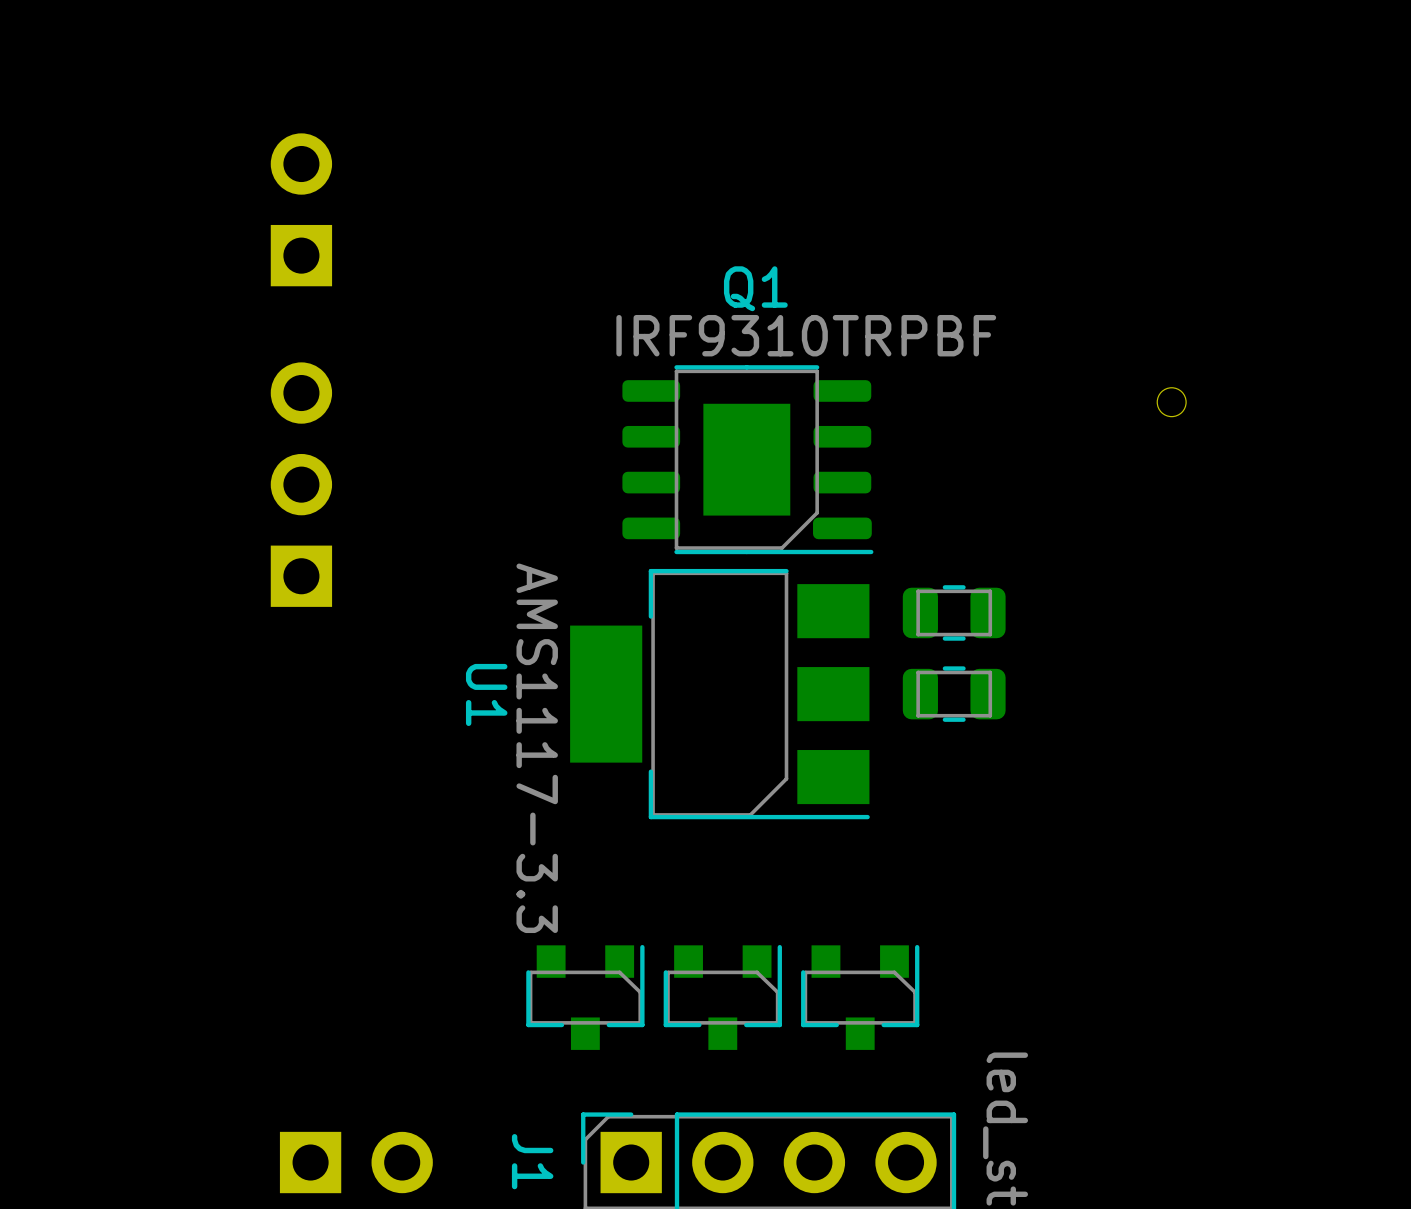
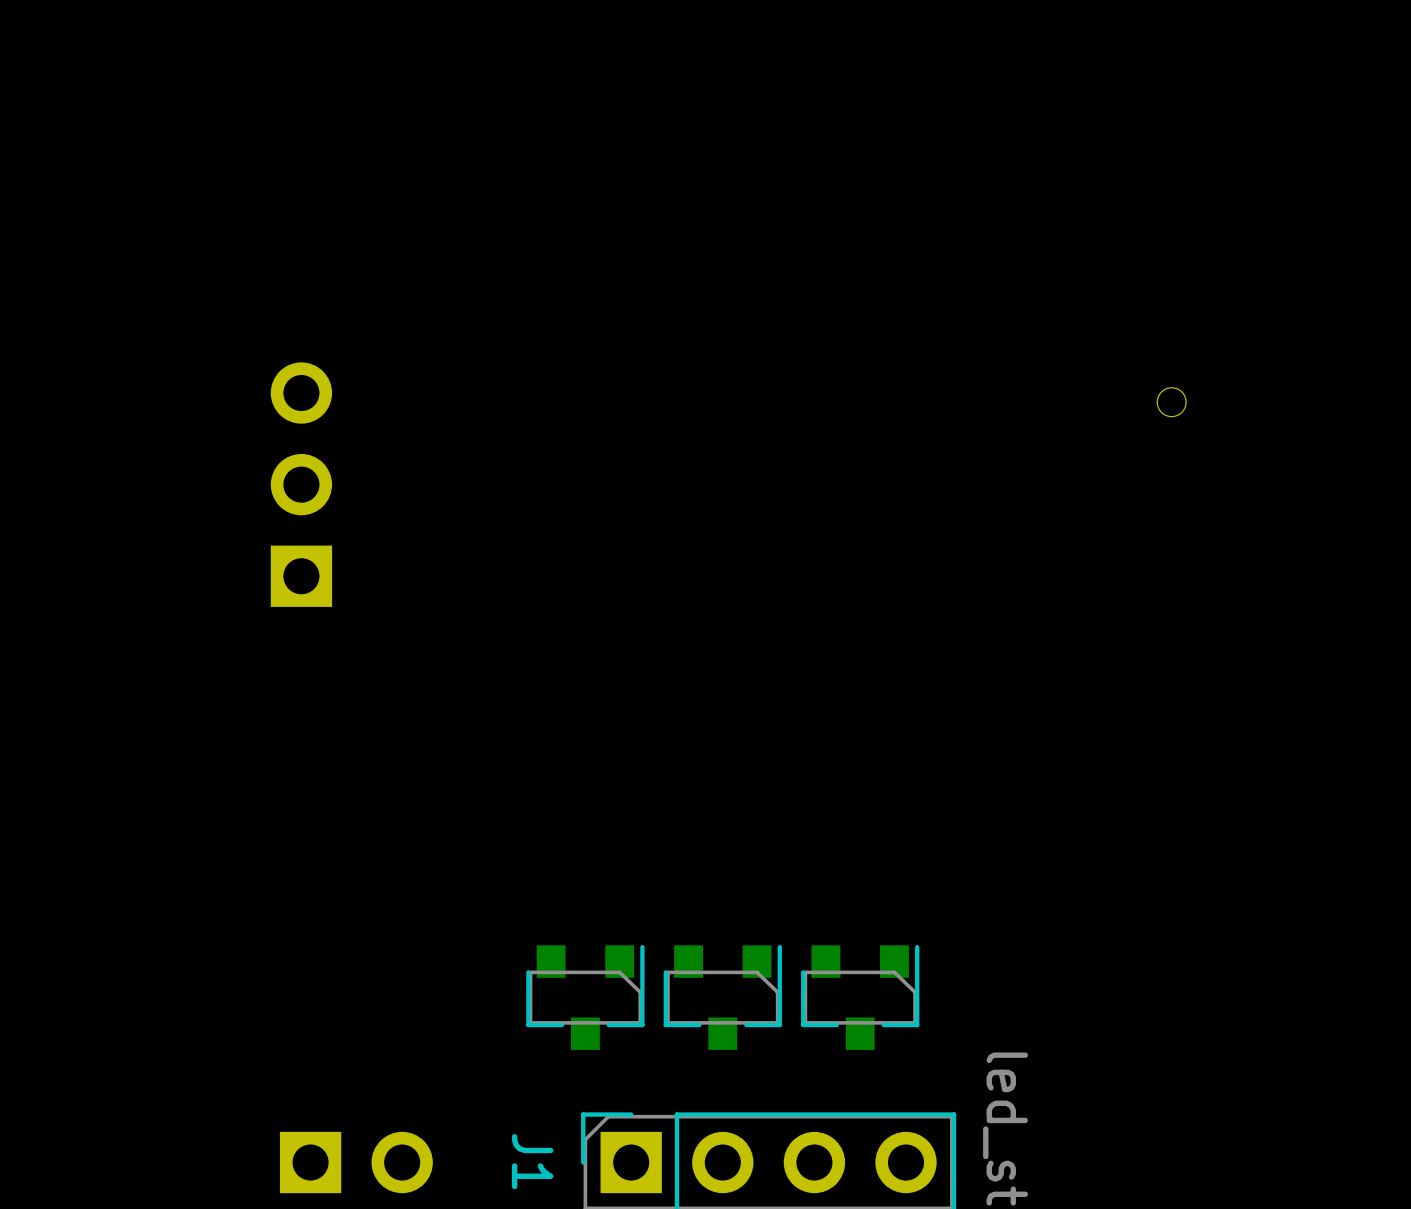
part: (301, 209) -> none
Q1: IRF9310TRPBF (747, 459) -> none
part: (954, 612) -> none
U1: AMS1117-3.3 (719, 694) -> none
part: (954, 694) -> none

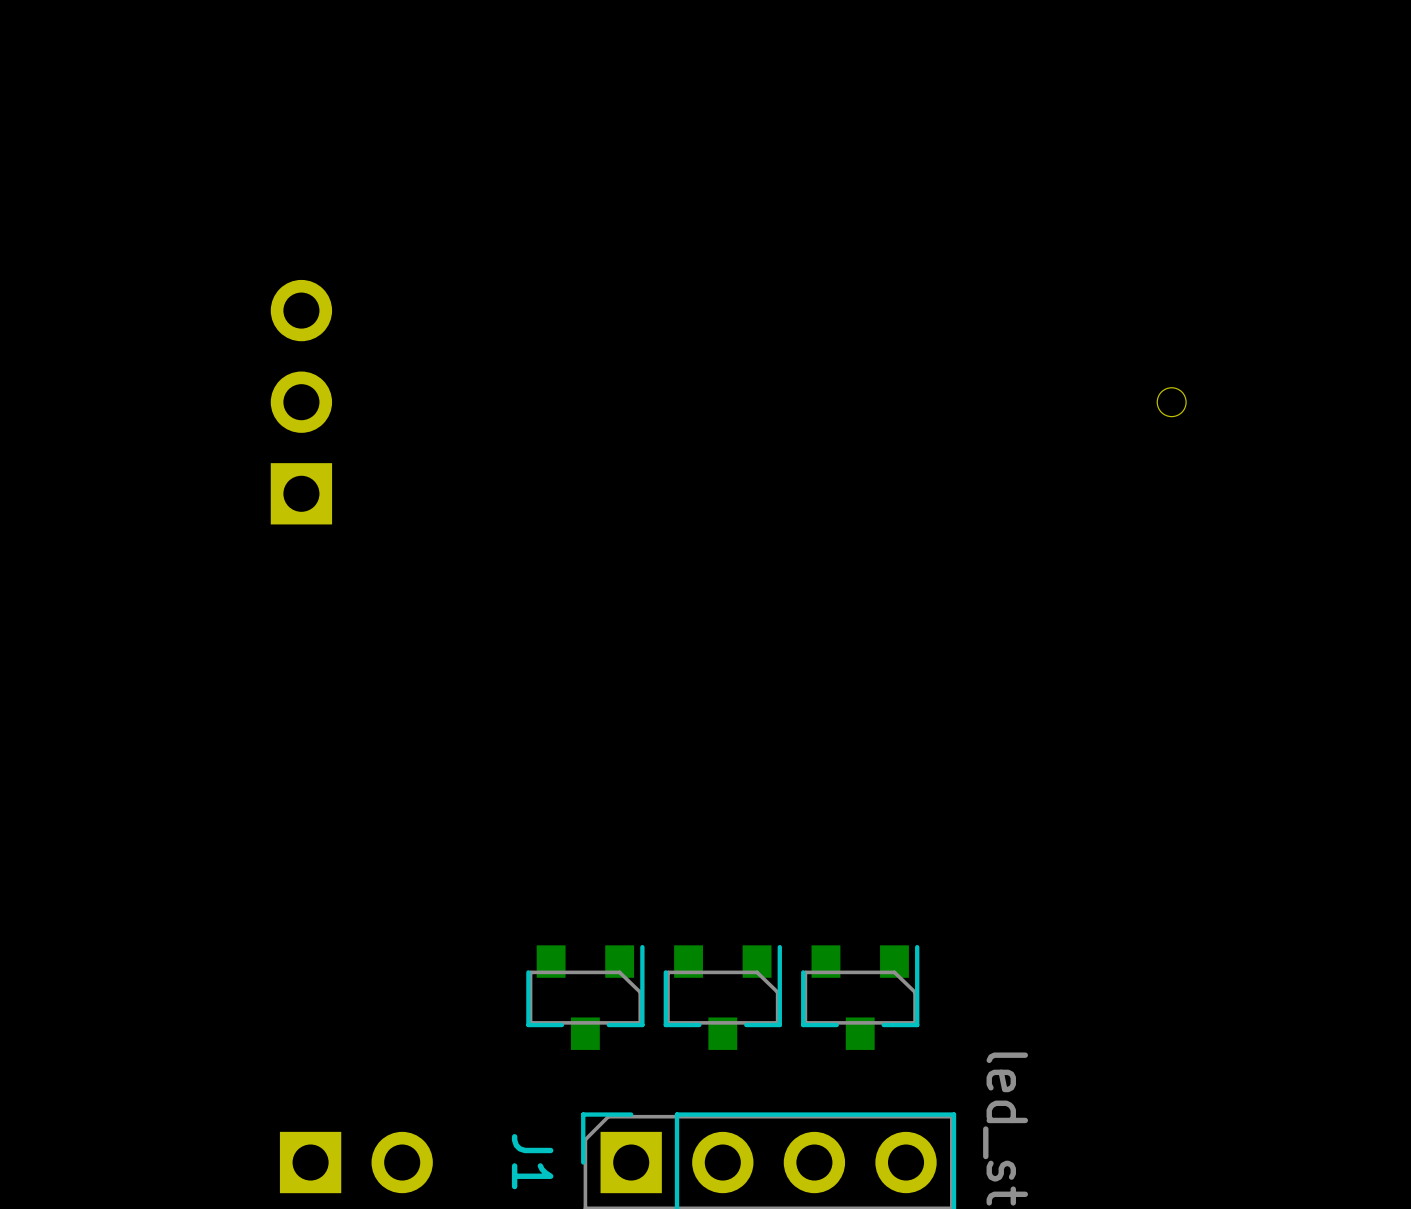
part position: (301, 484) -> (301, 402)

